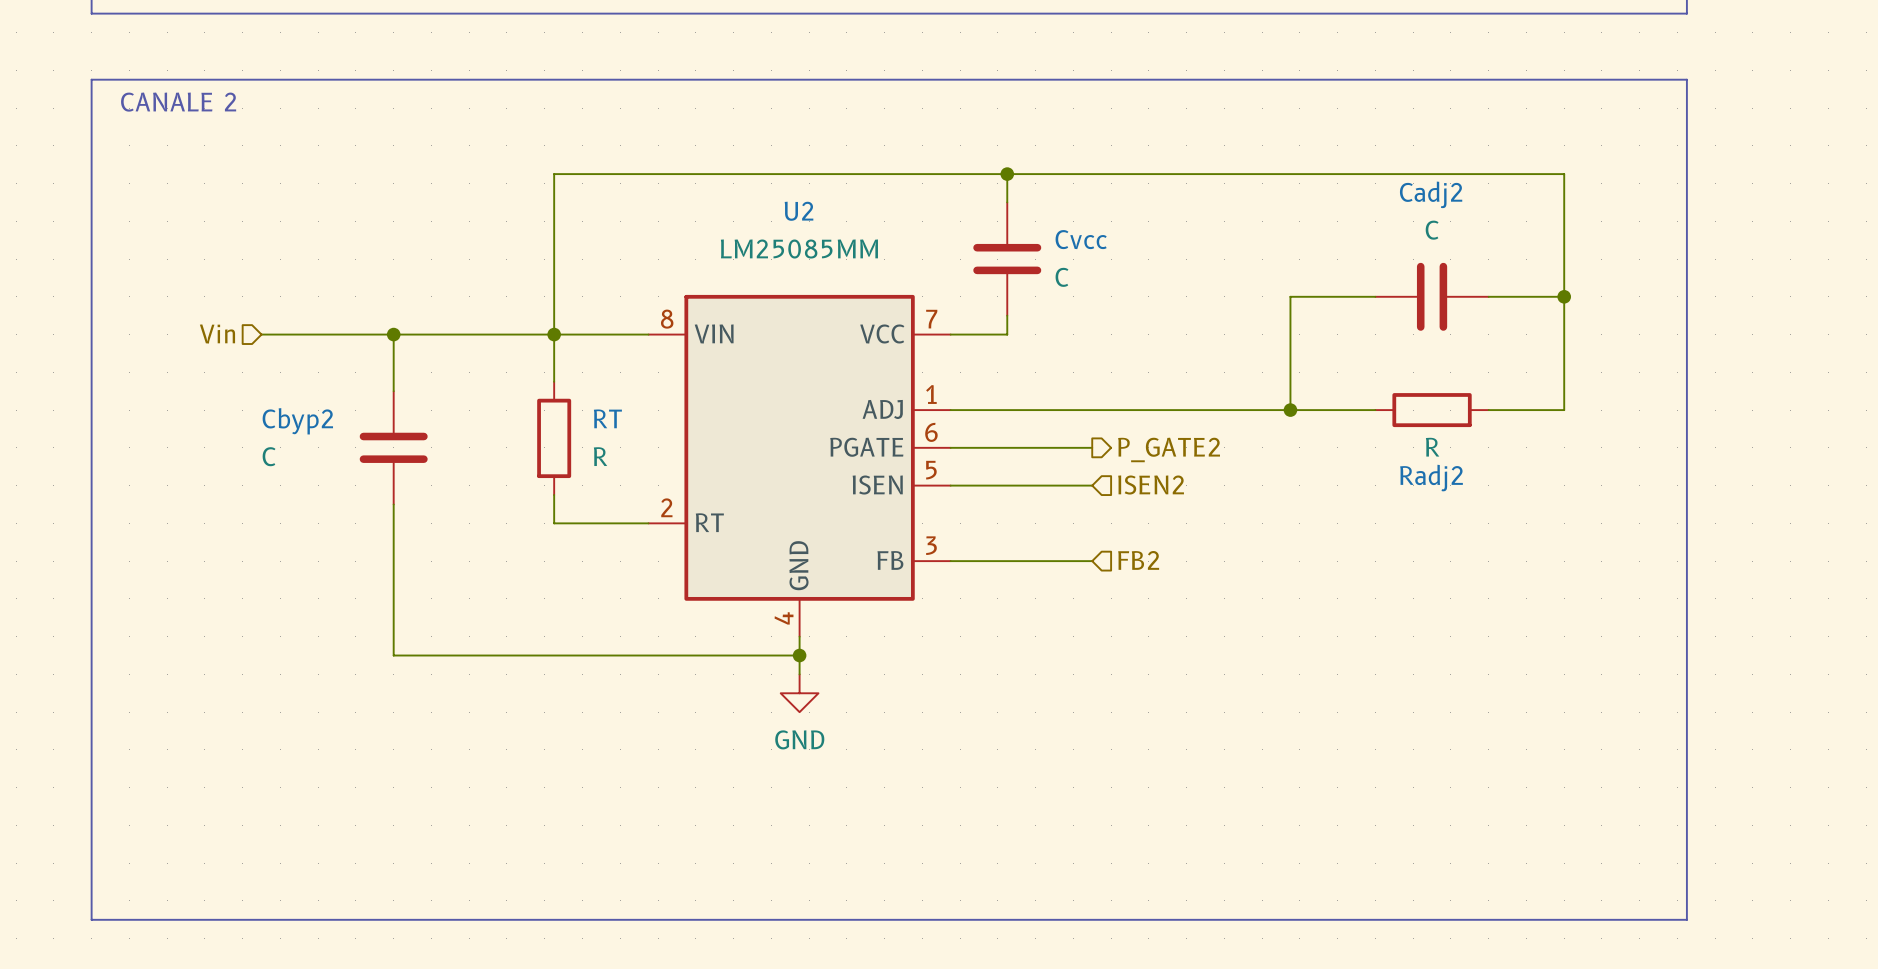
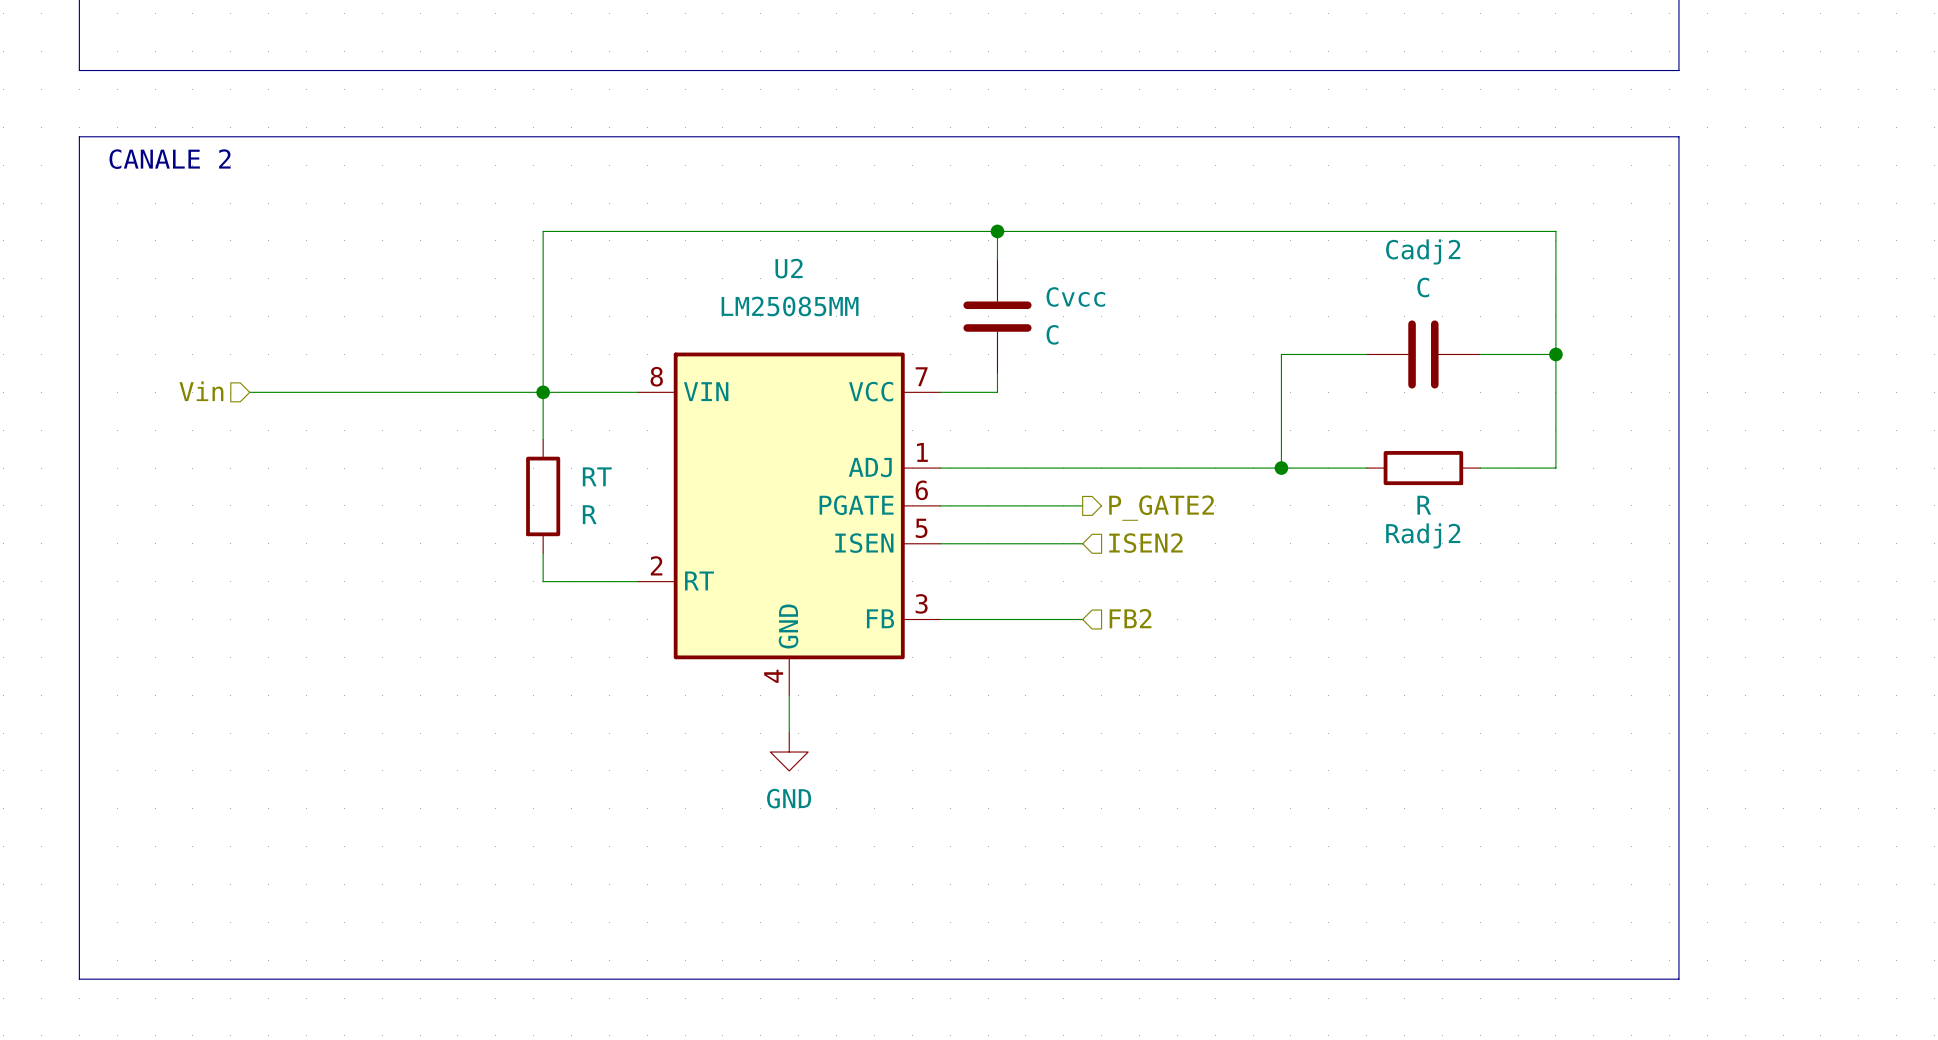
wire: (393, 334) (393, 391) -> none
junction: (393, 334) -> none
Cbyp2: C (393, 447) -> none
wire: (393, 504) (393, 655) (799, 655) -> none
junction: (799, 655) -> none

